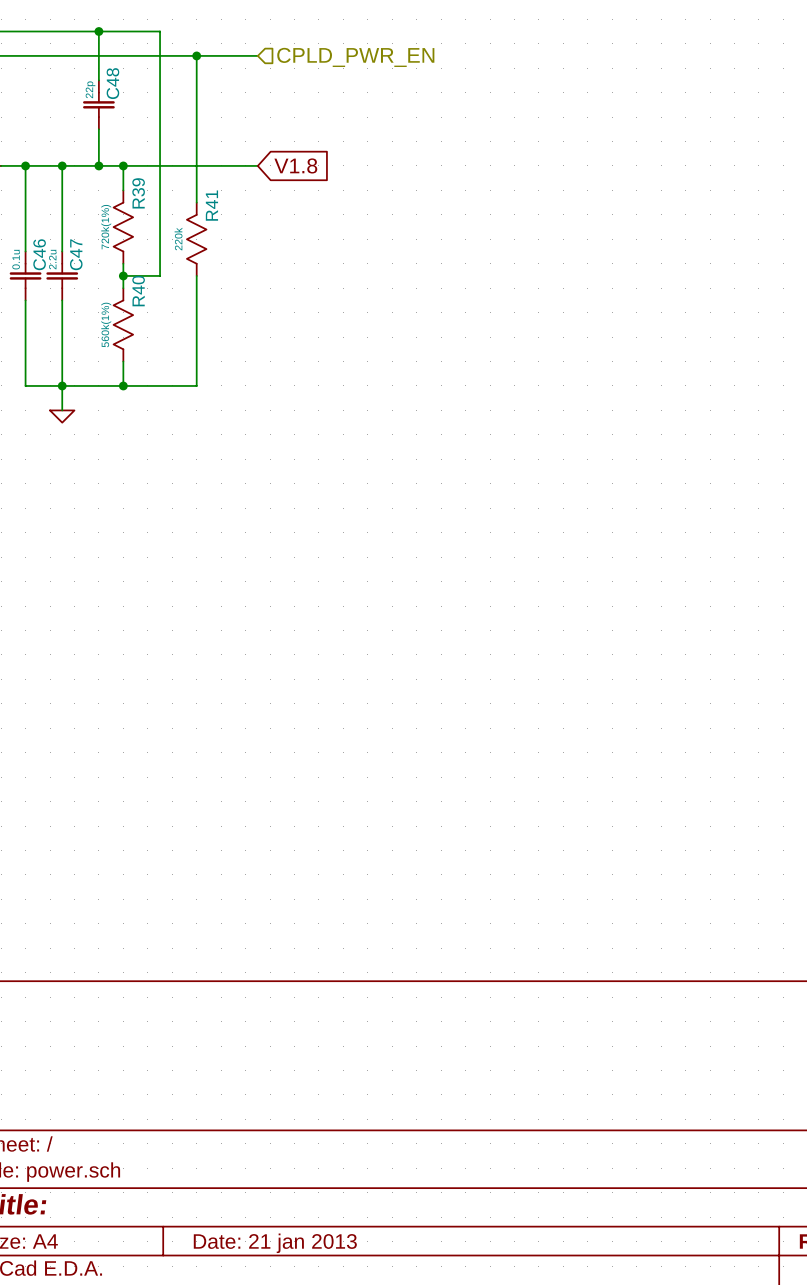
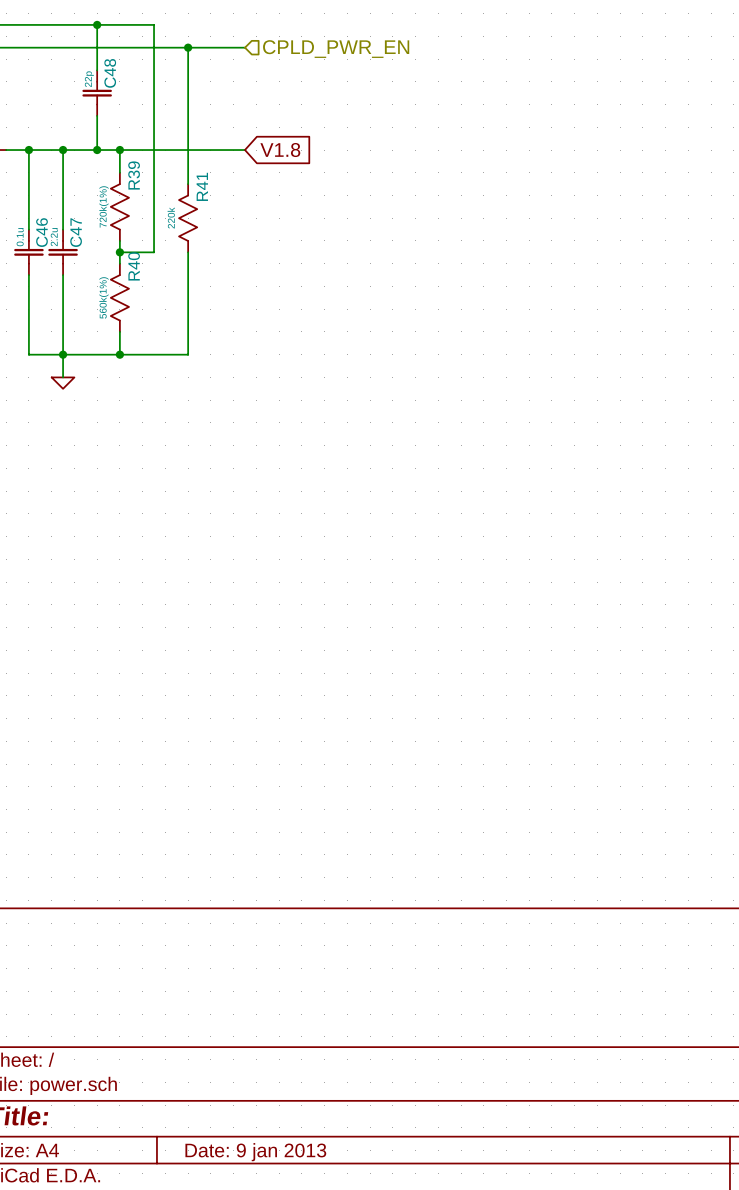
title block: Date: 21 jan 2013 (275, 1243) -> Date: 9 jan 2013 (255, 1152)

